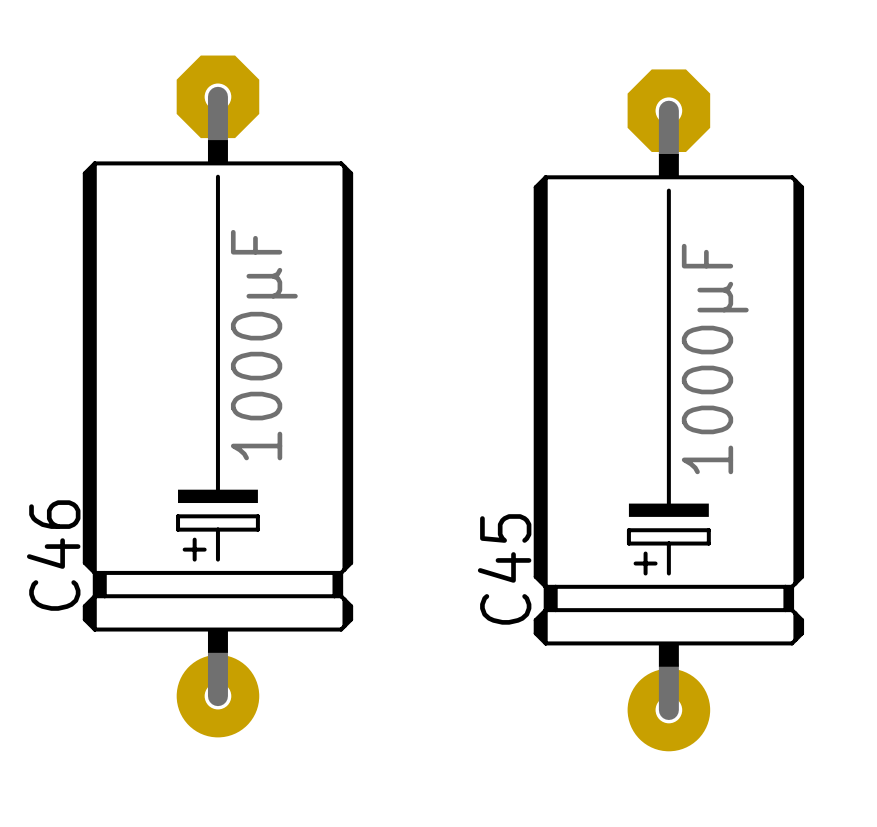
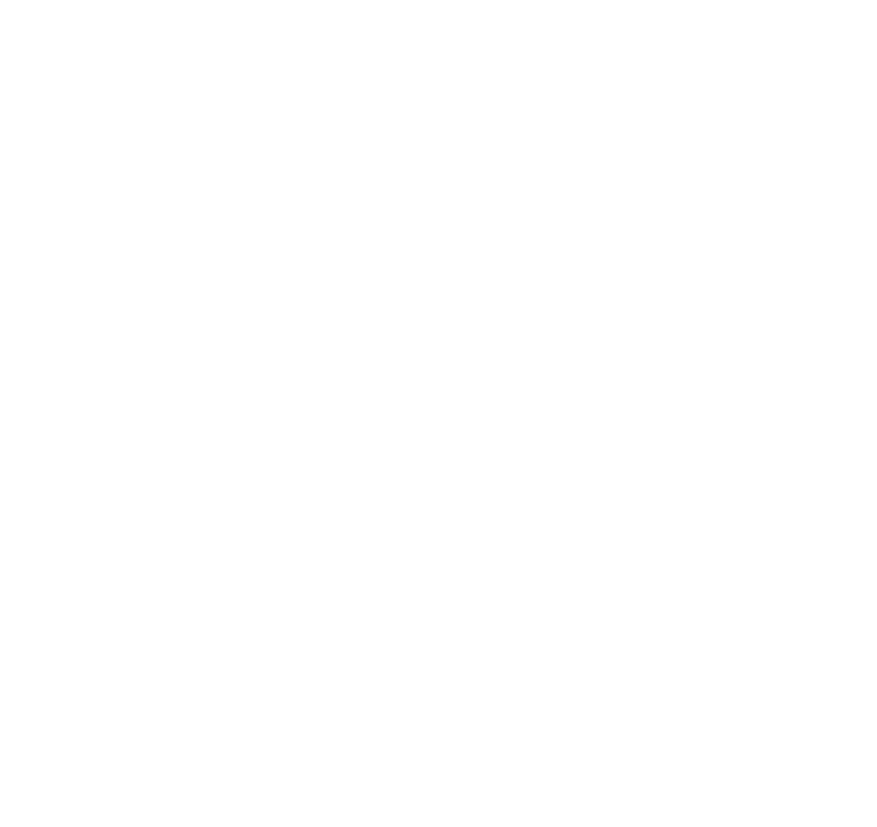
C46: 1000µF (217, 396) -> none
C45: 1000µF (668, 410) -> none

